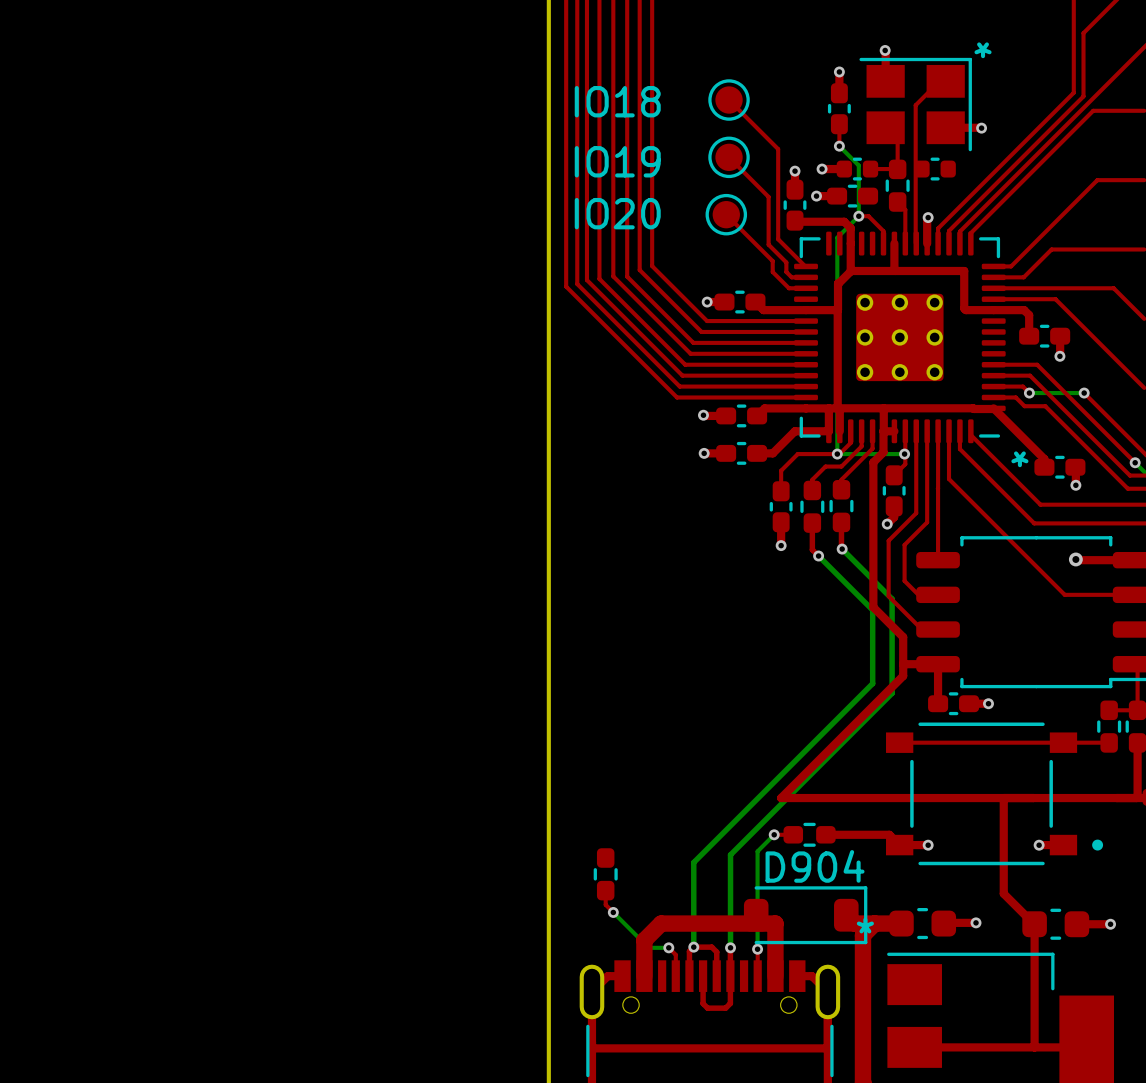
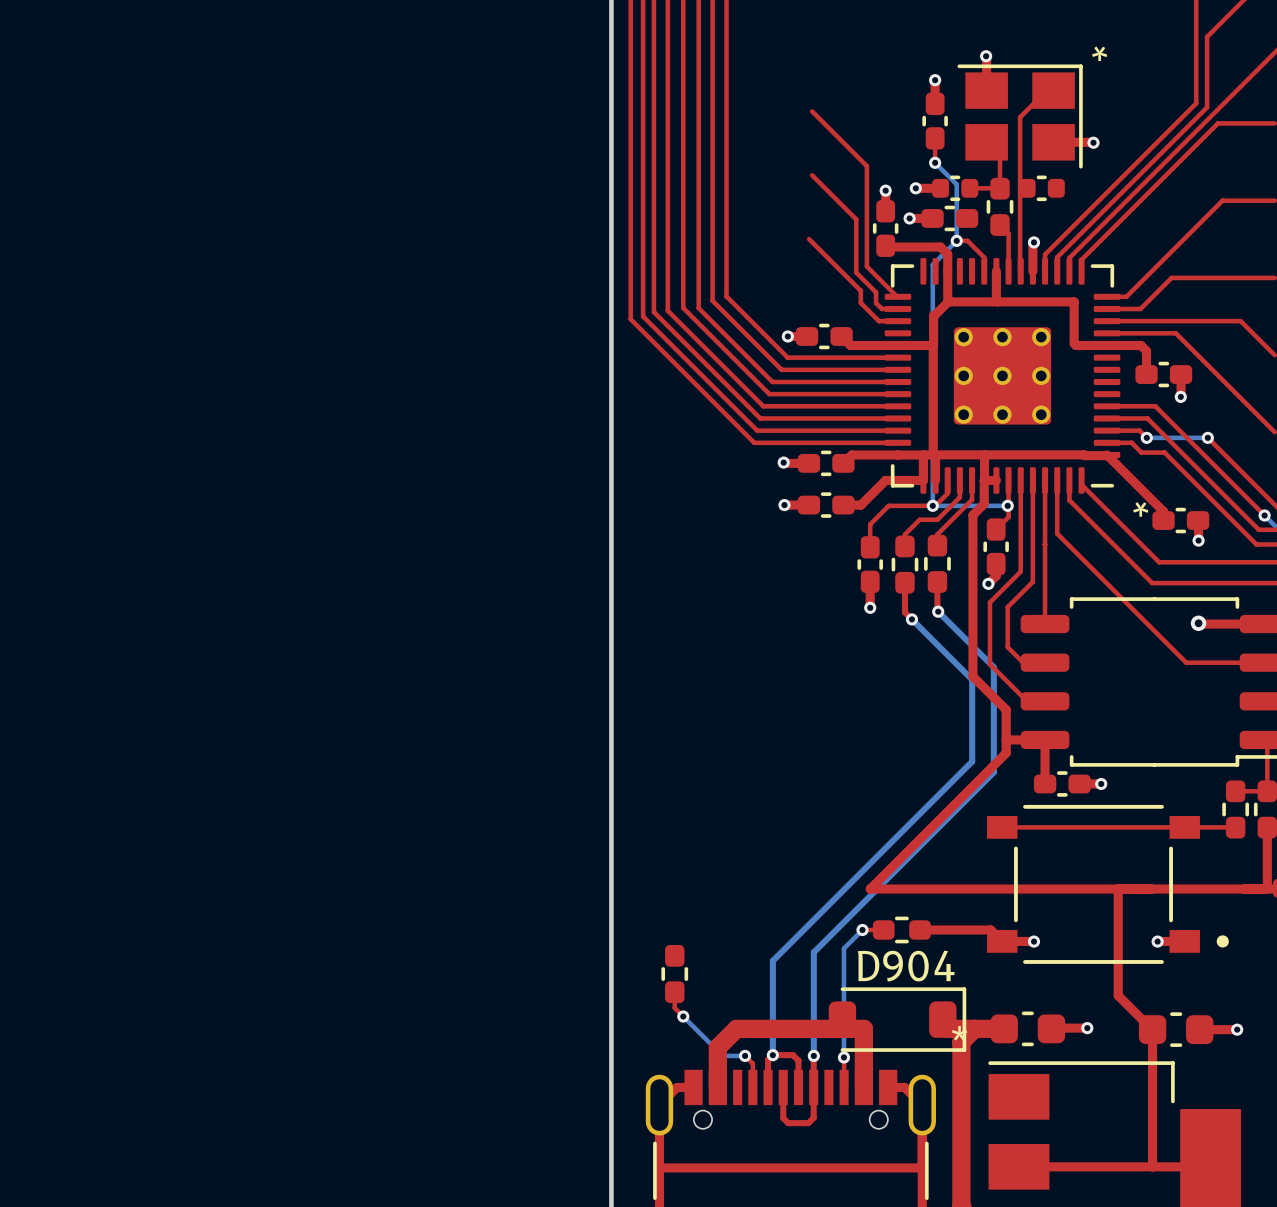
IO18: (729, 100) -> none
IO19: (729, 157) -> none
IO20: (726, 214) -> none

